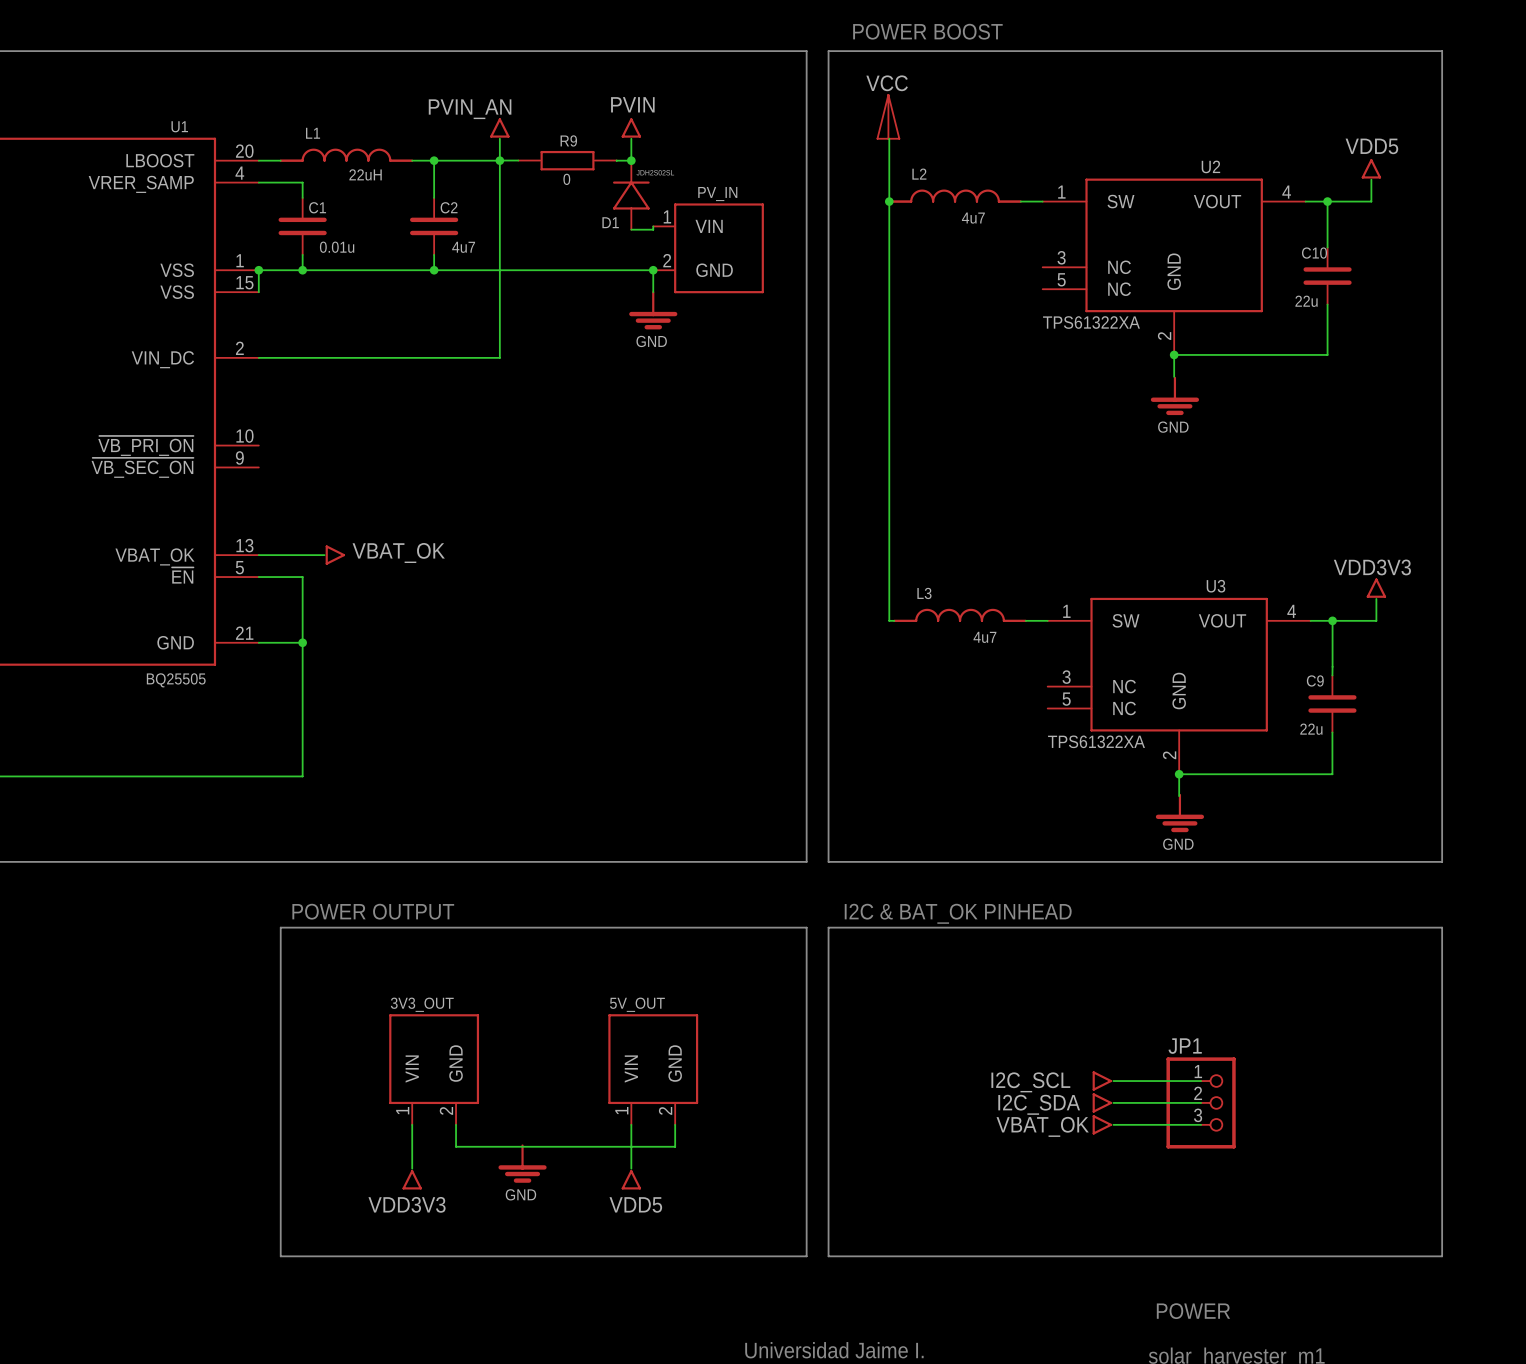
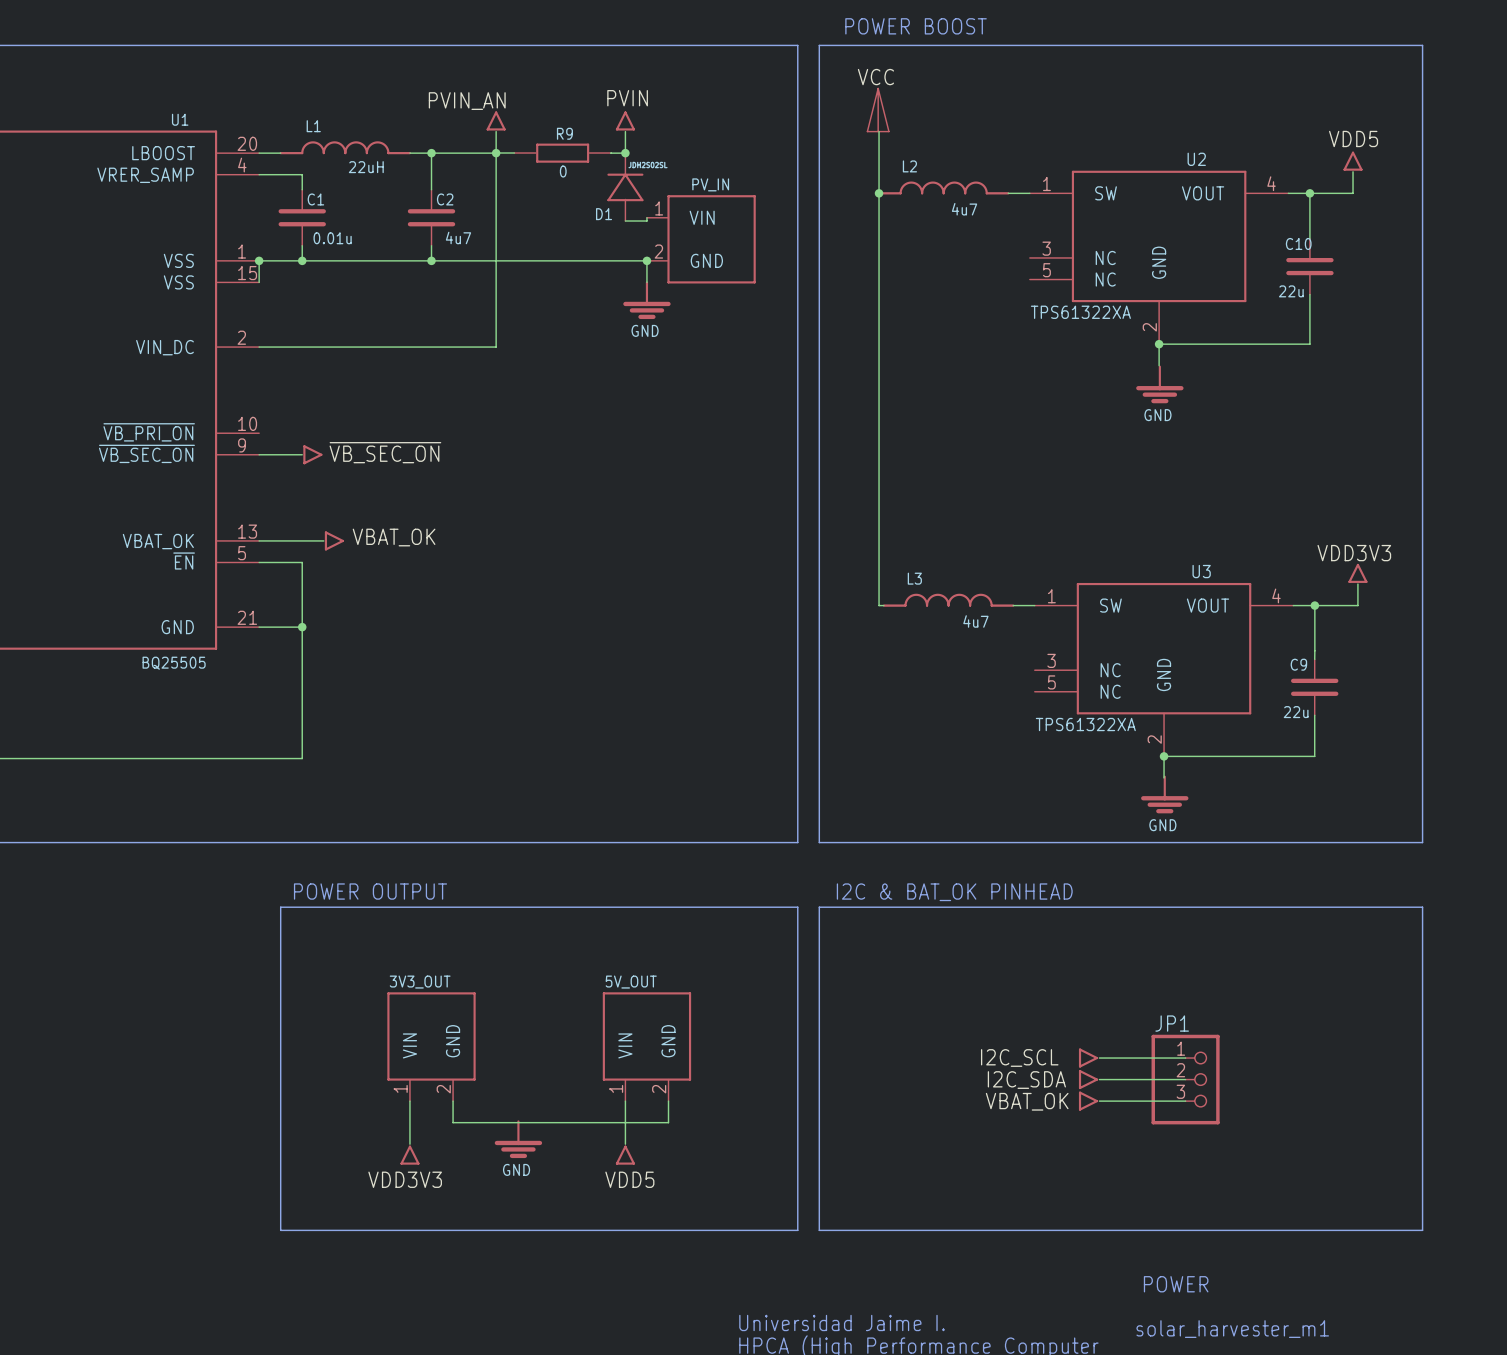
label: none -> ~{VB_SEC_ON} (385, 452)
wire: none -> (259, 454) (302, 454)
part: none -> (312, 454)

